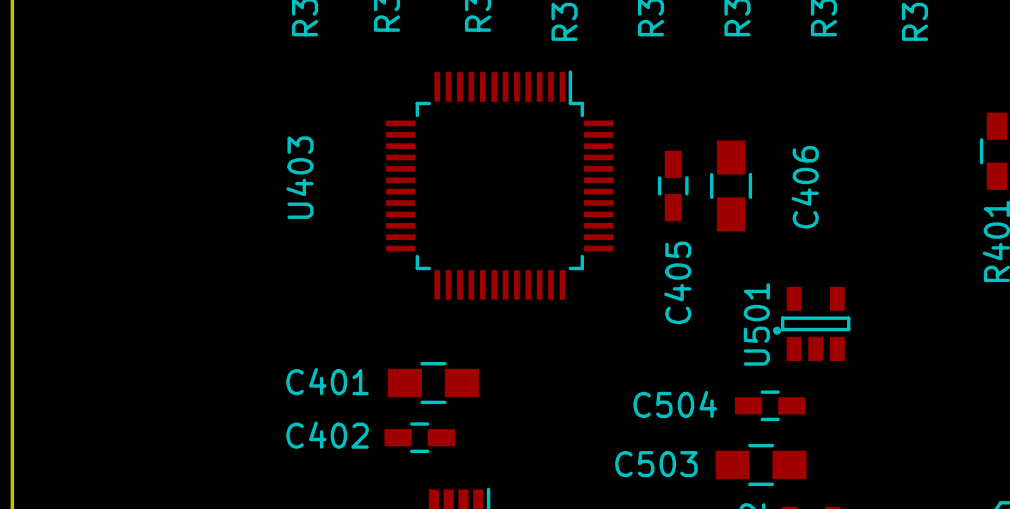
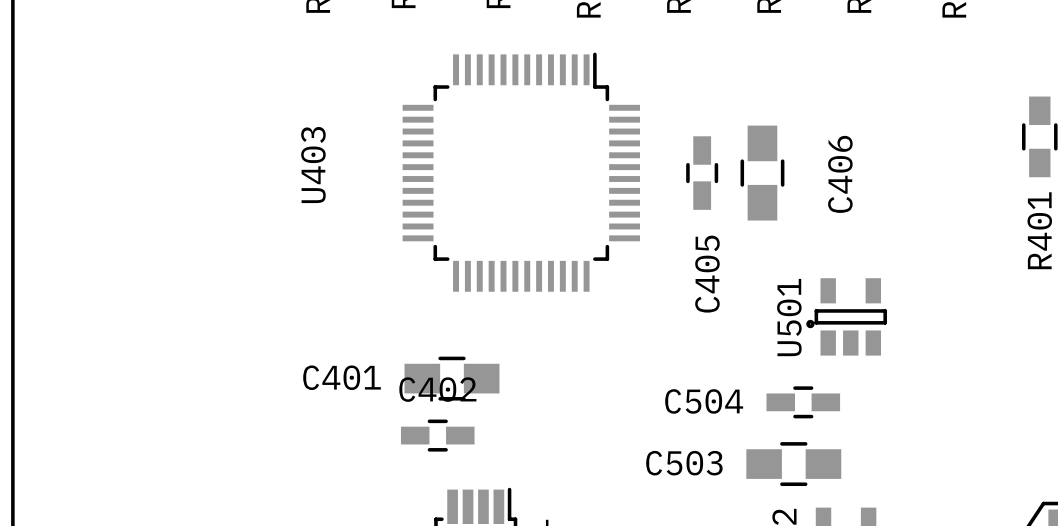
C402 name position: C402 (327, 435) -> C402 (437, 389)

